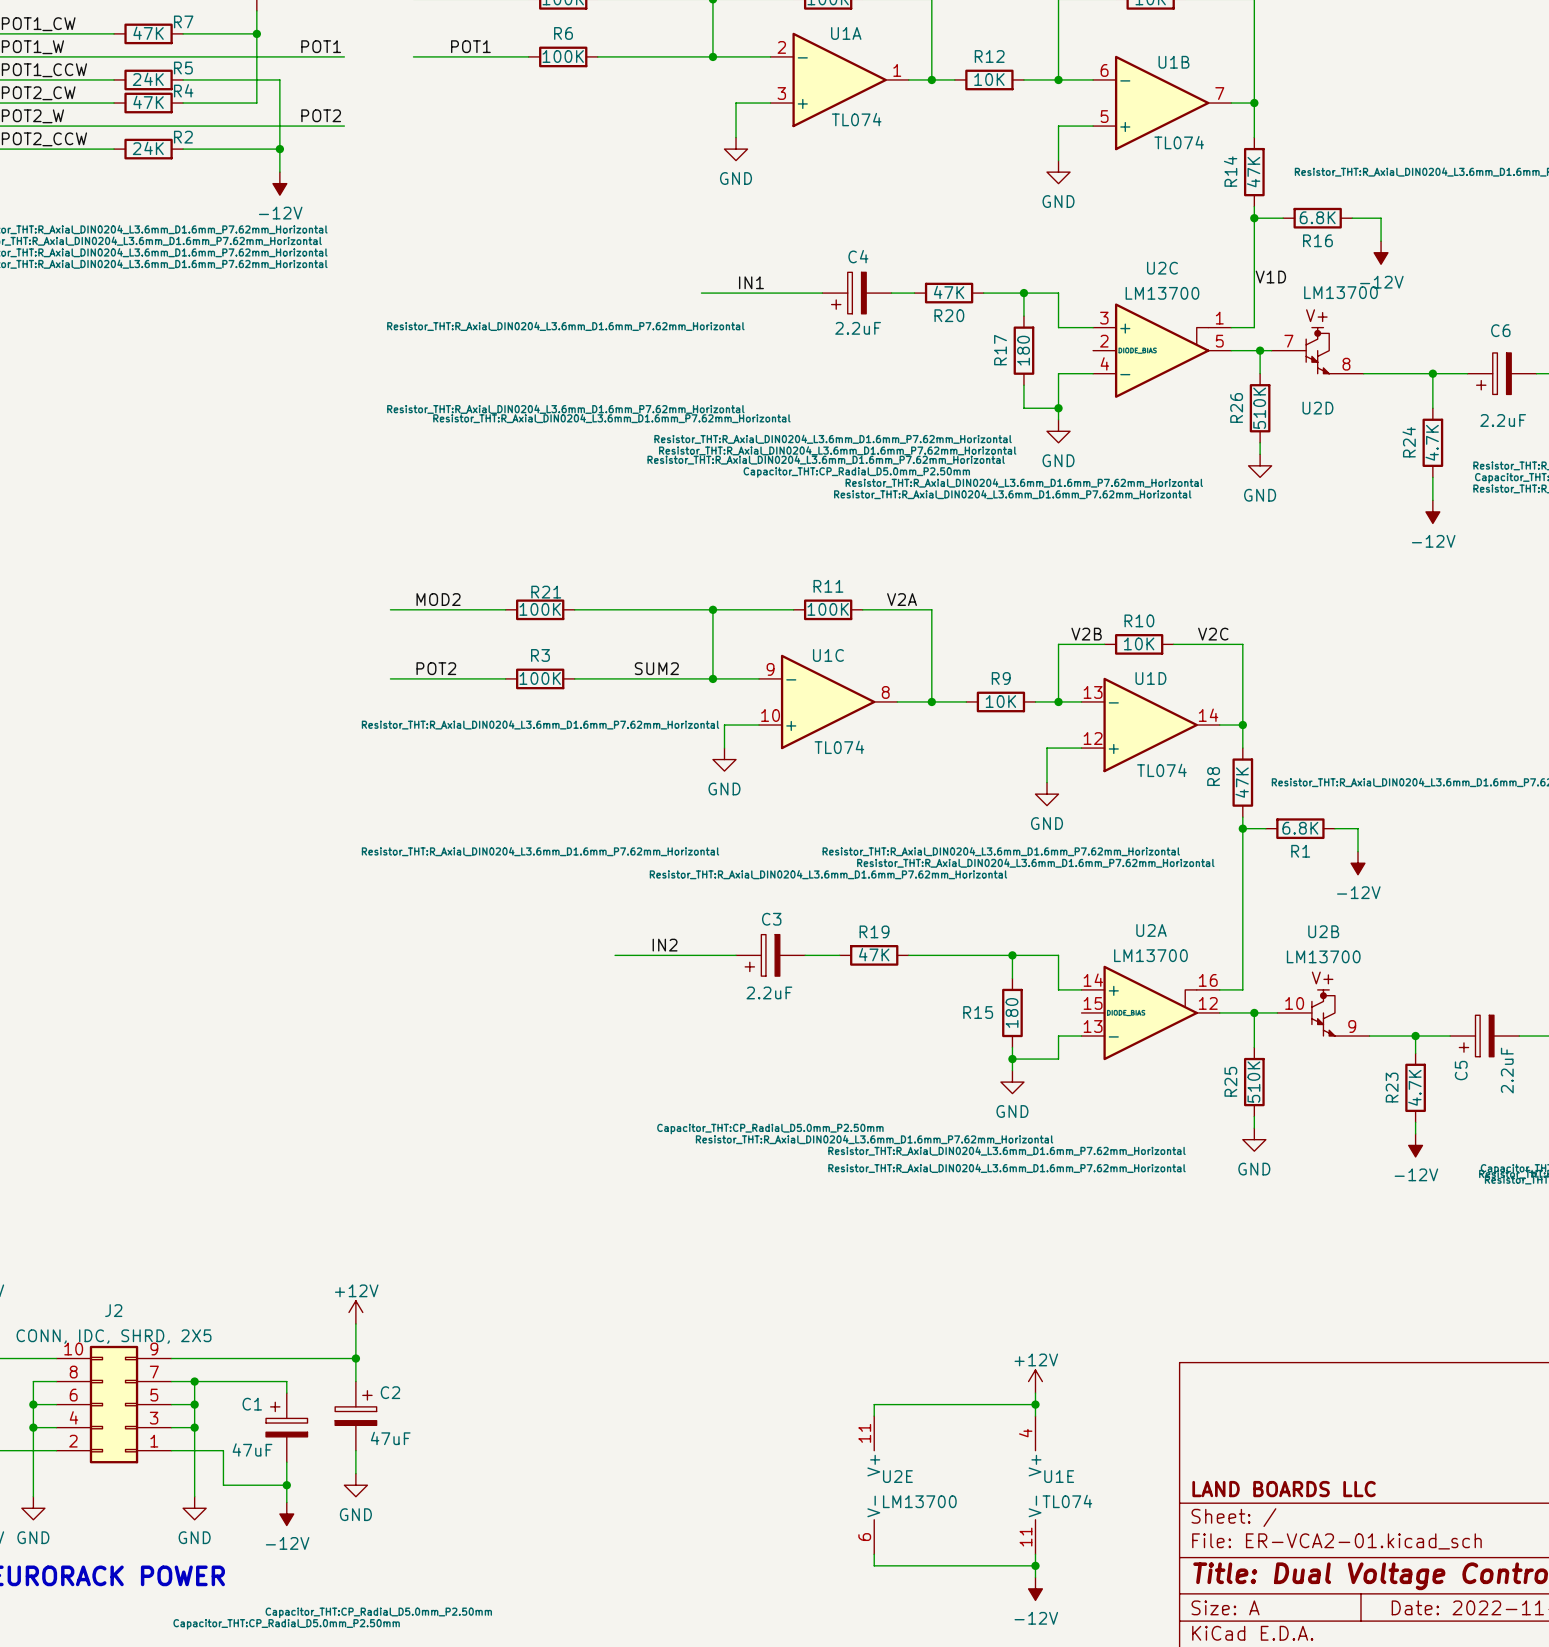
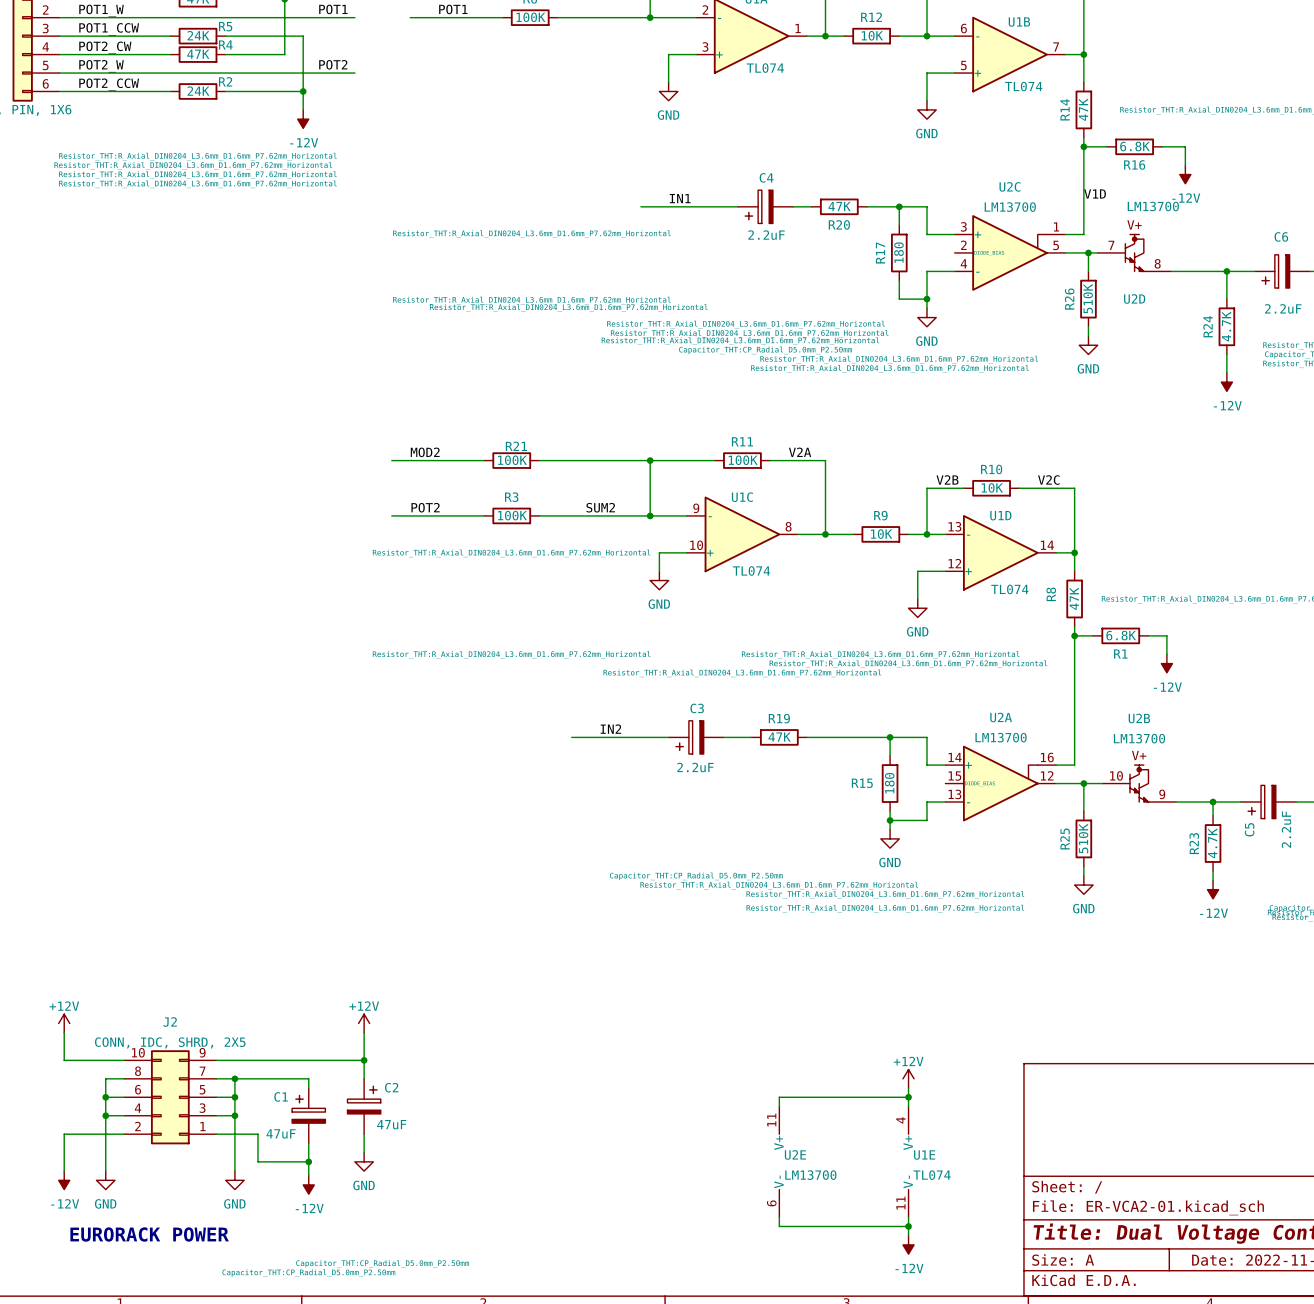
title block: LAND BOARDS LLC (1284, 1489) -> none

